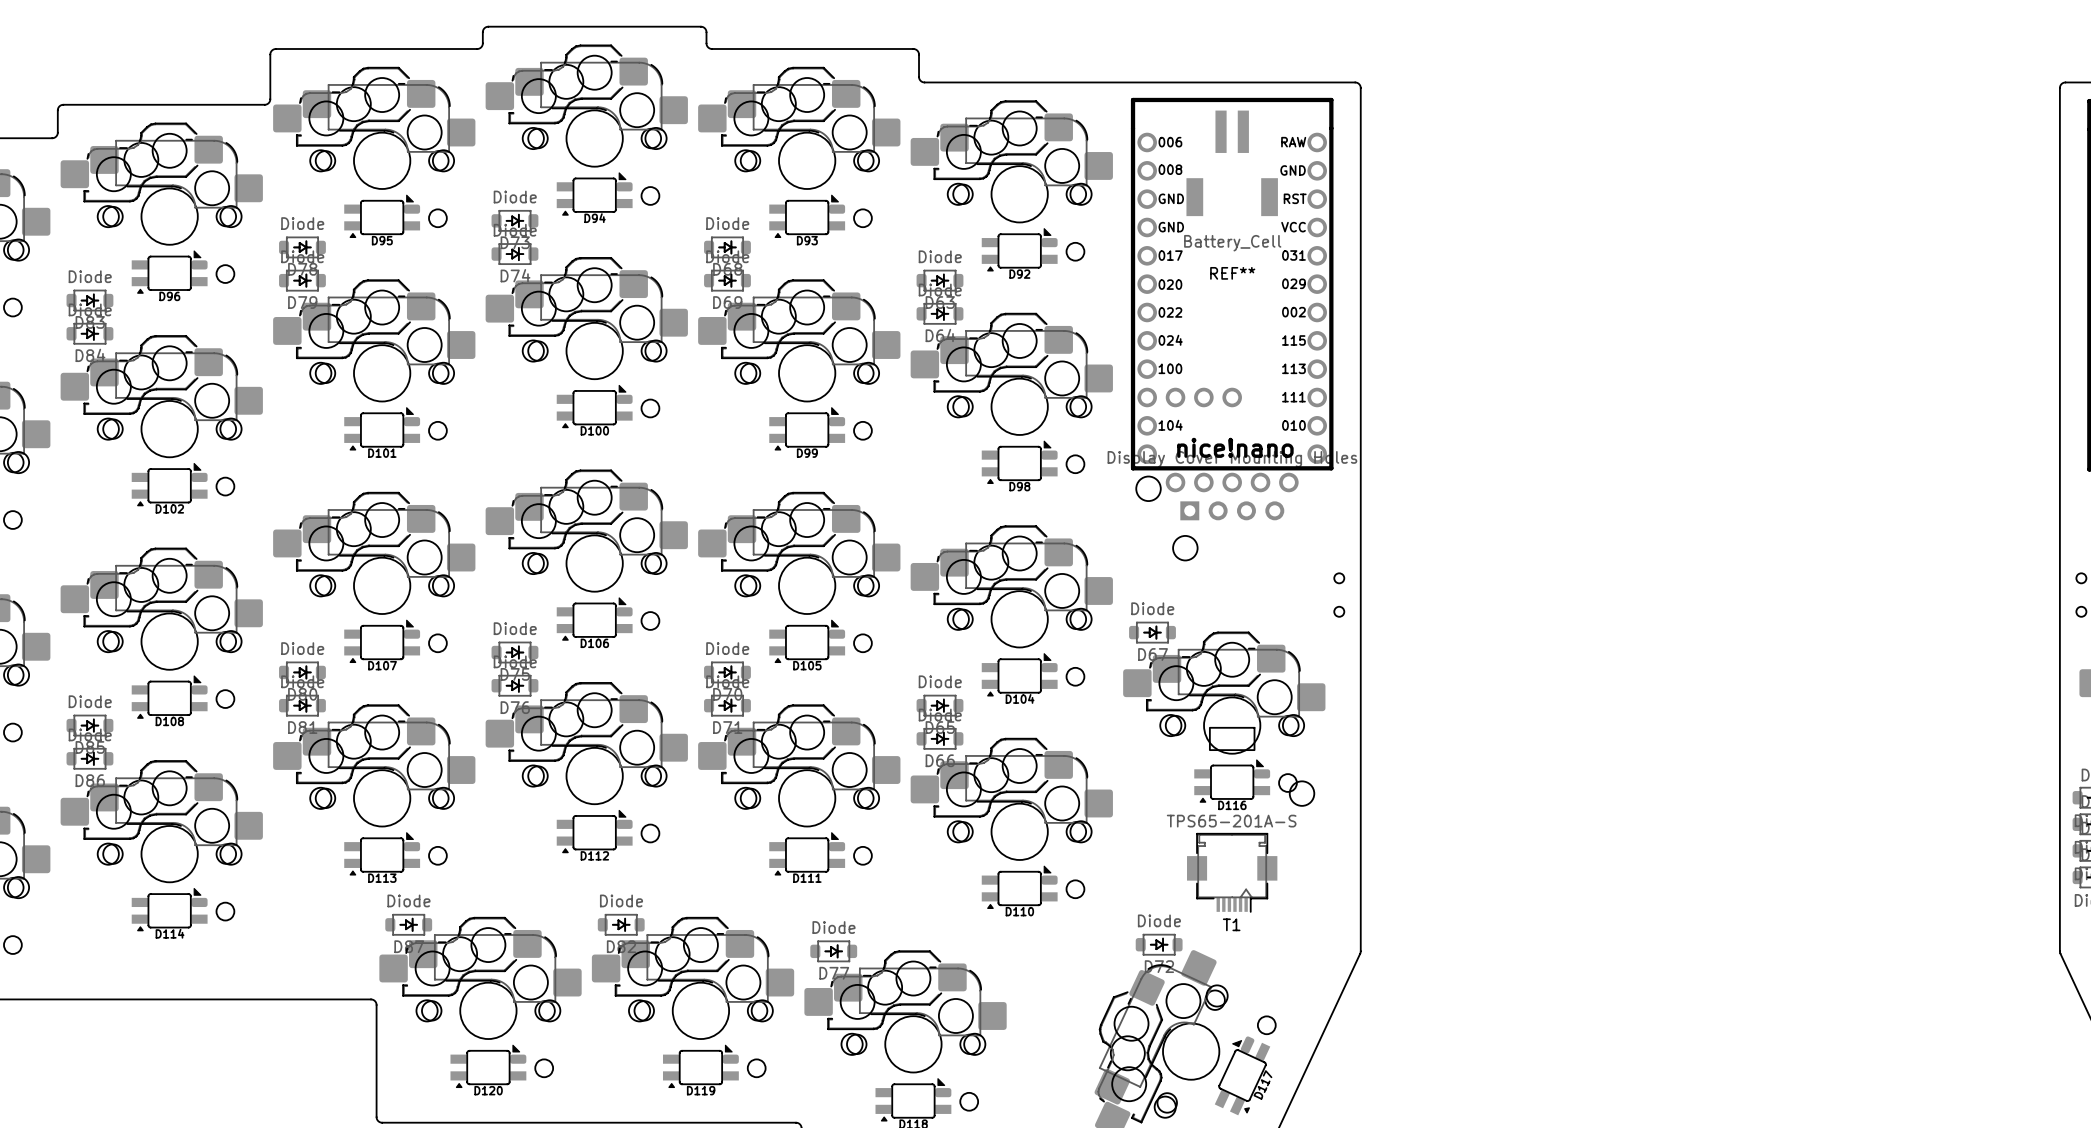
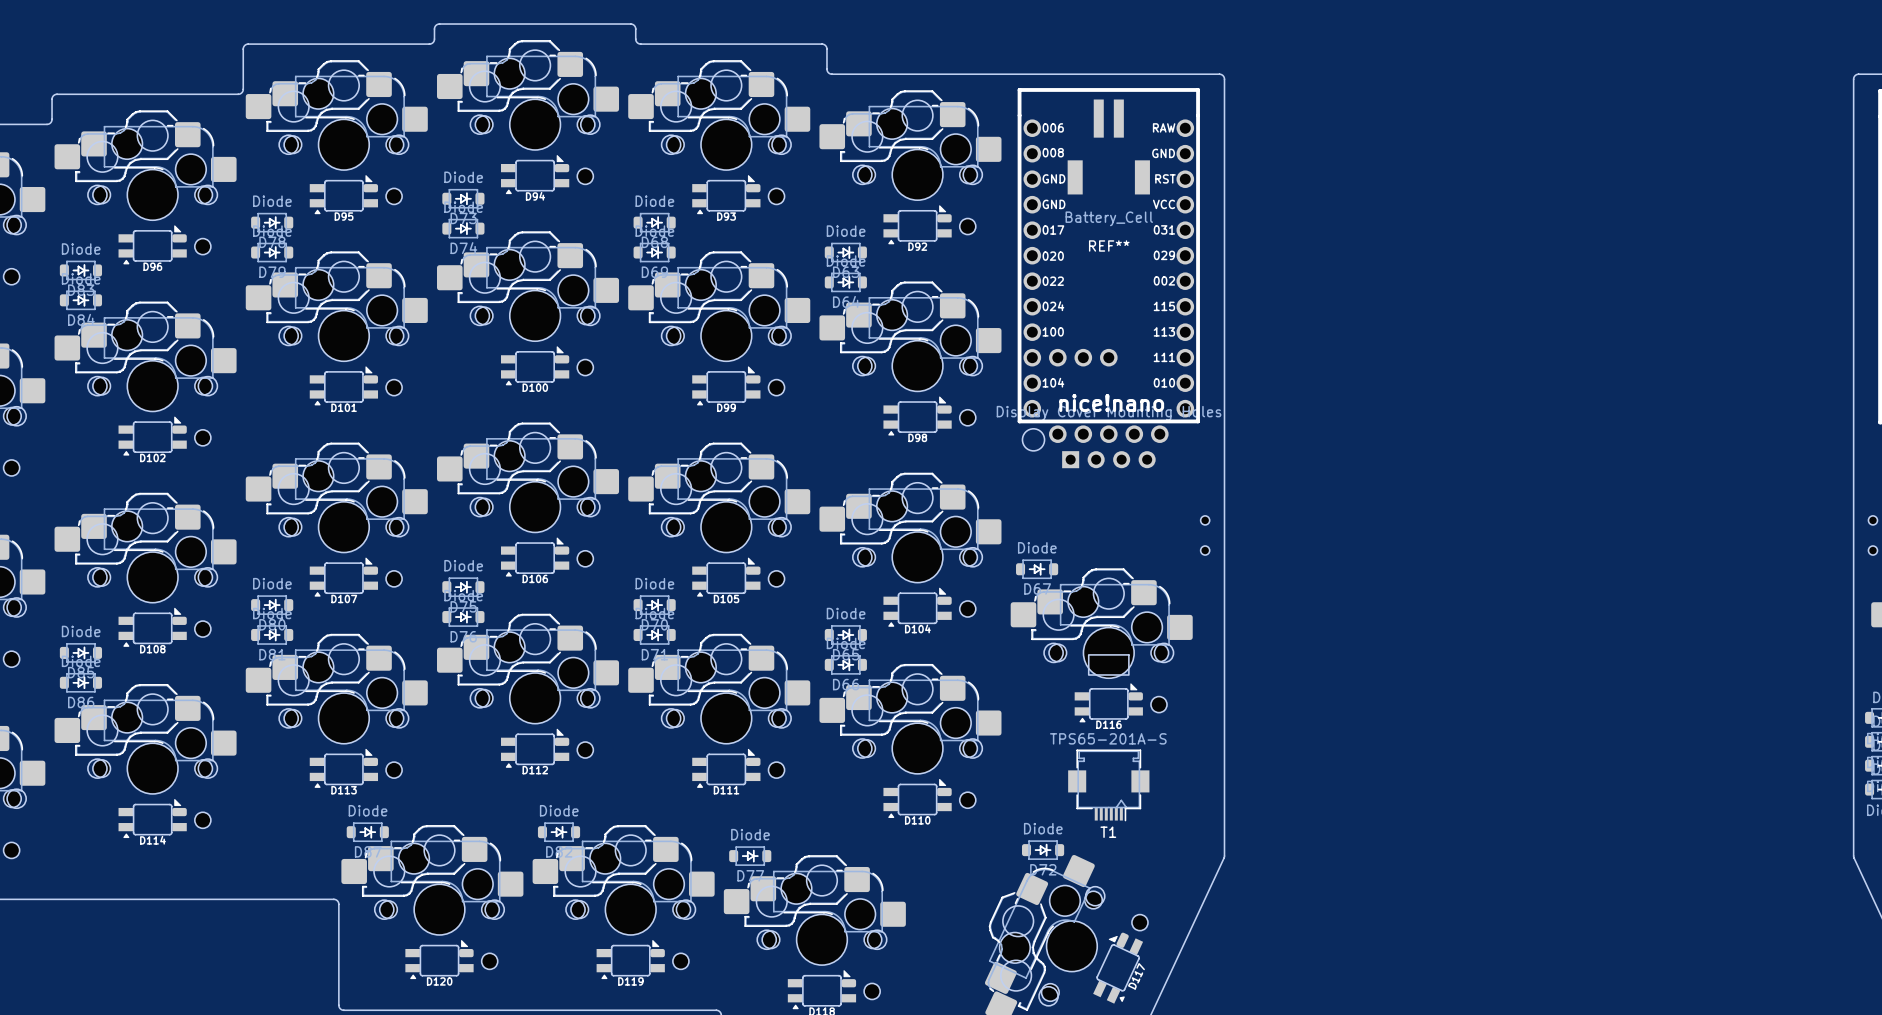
drawing: [1172, 535, 1315, 807] -> none

